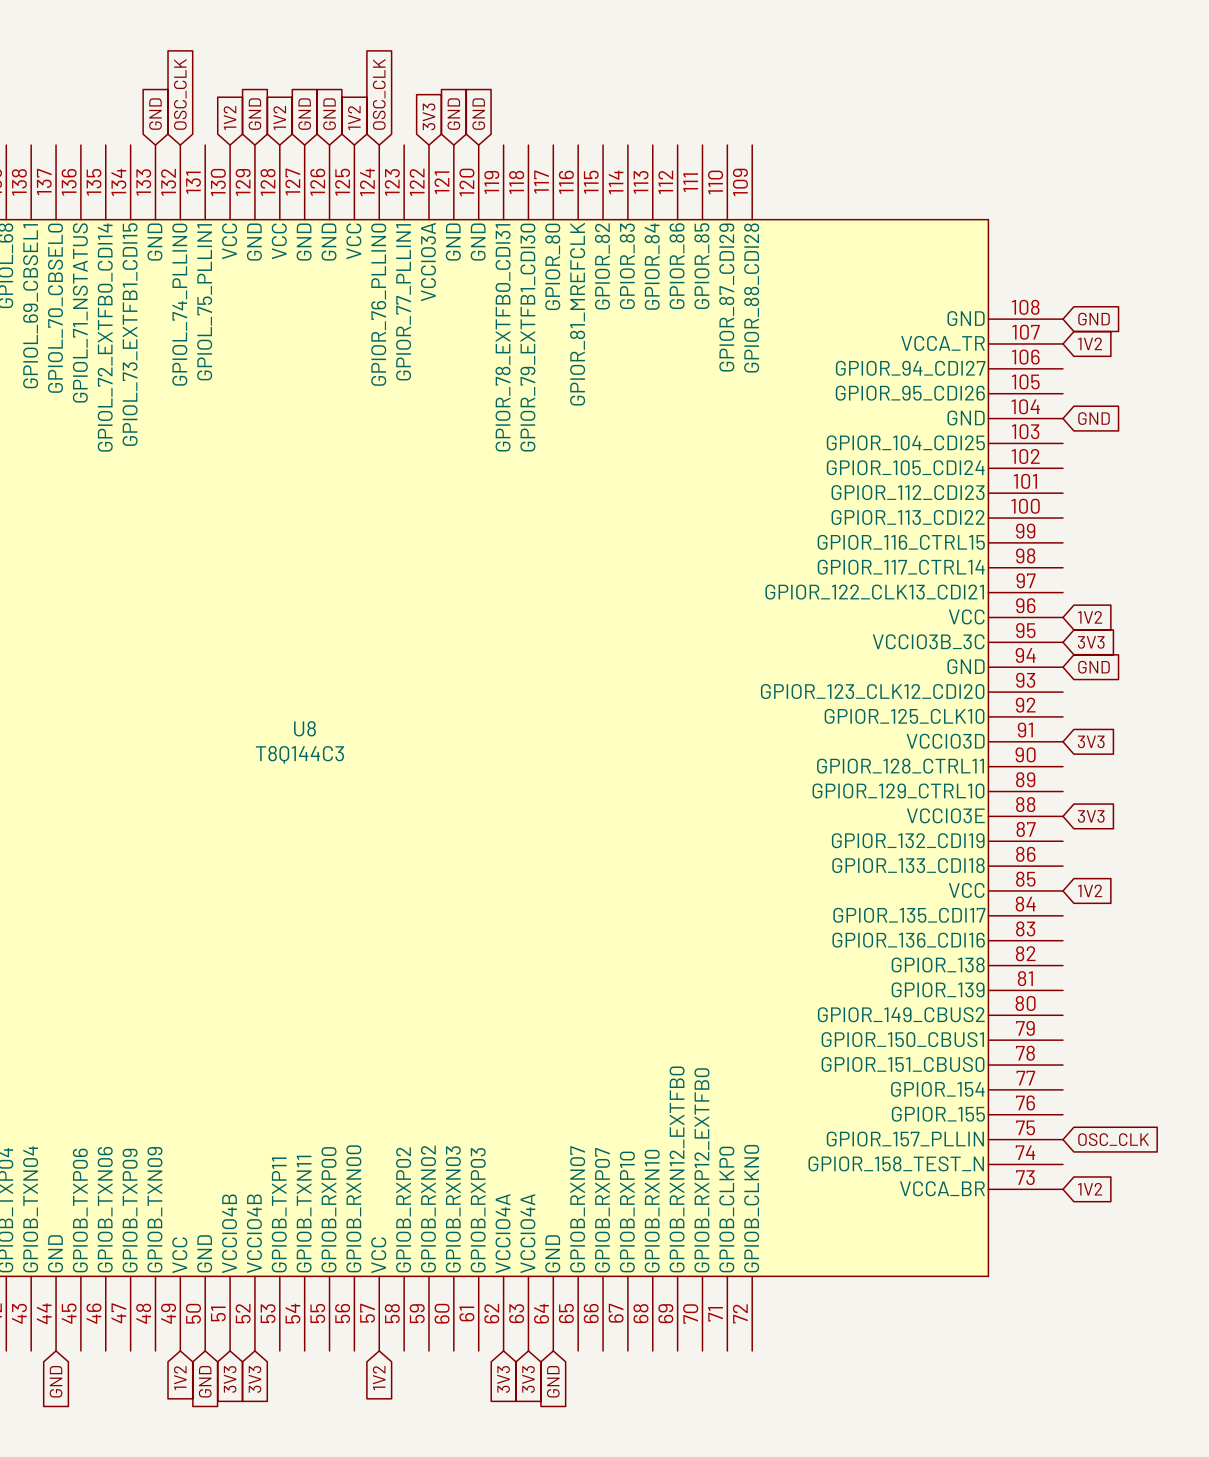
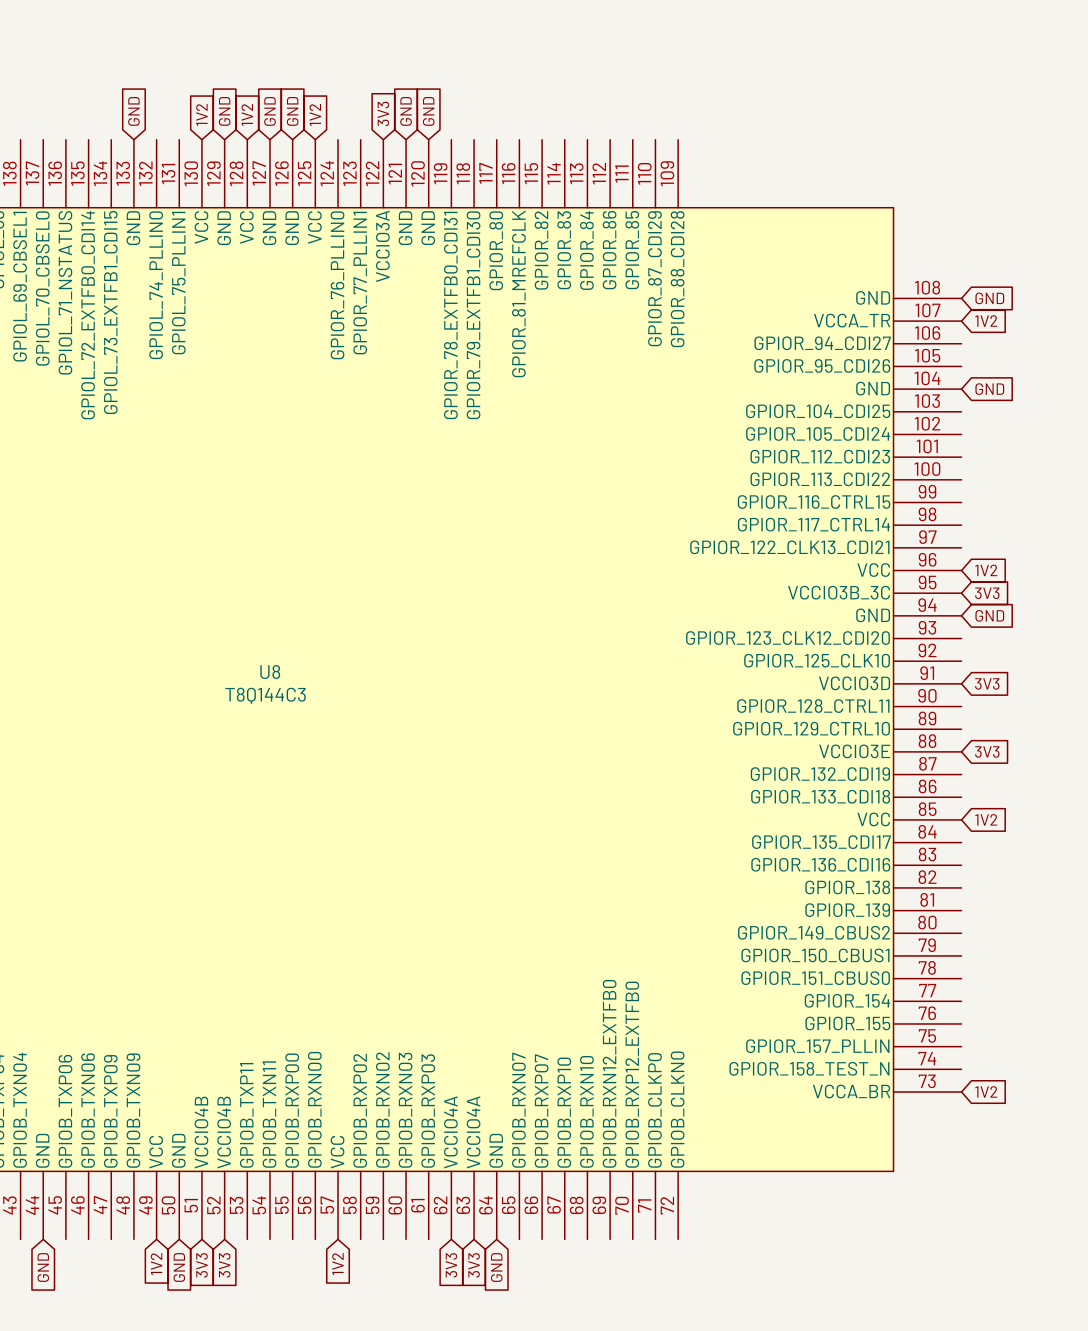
global label: OSC_CLK (180, 94) -> none
global label: OSC_CLK (379, 94) -> none
global label: OSC_CLK (1113, 1139) -> none

